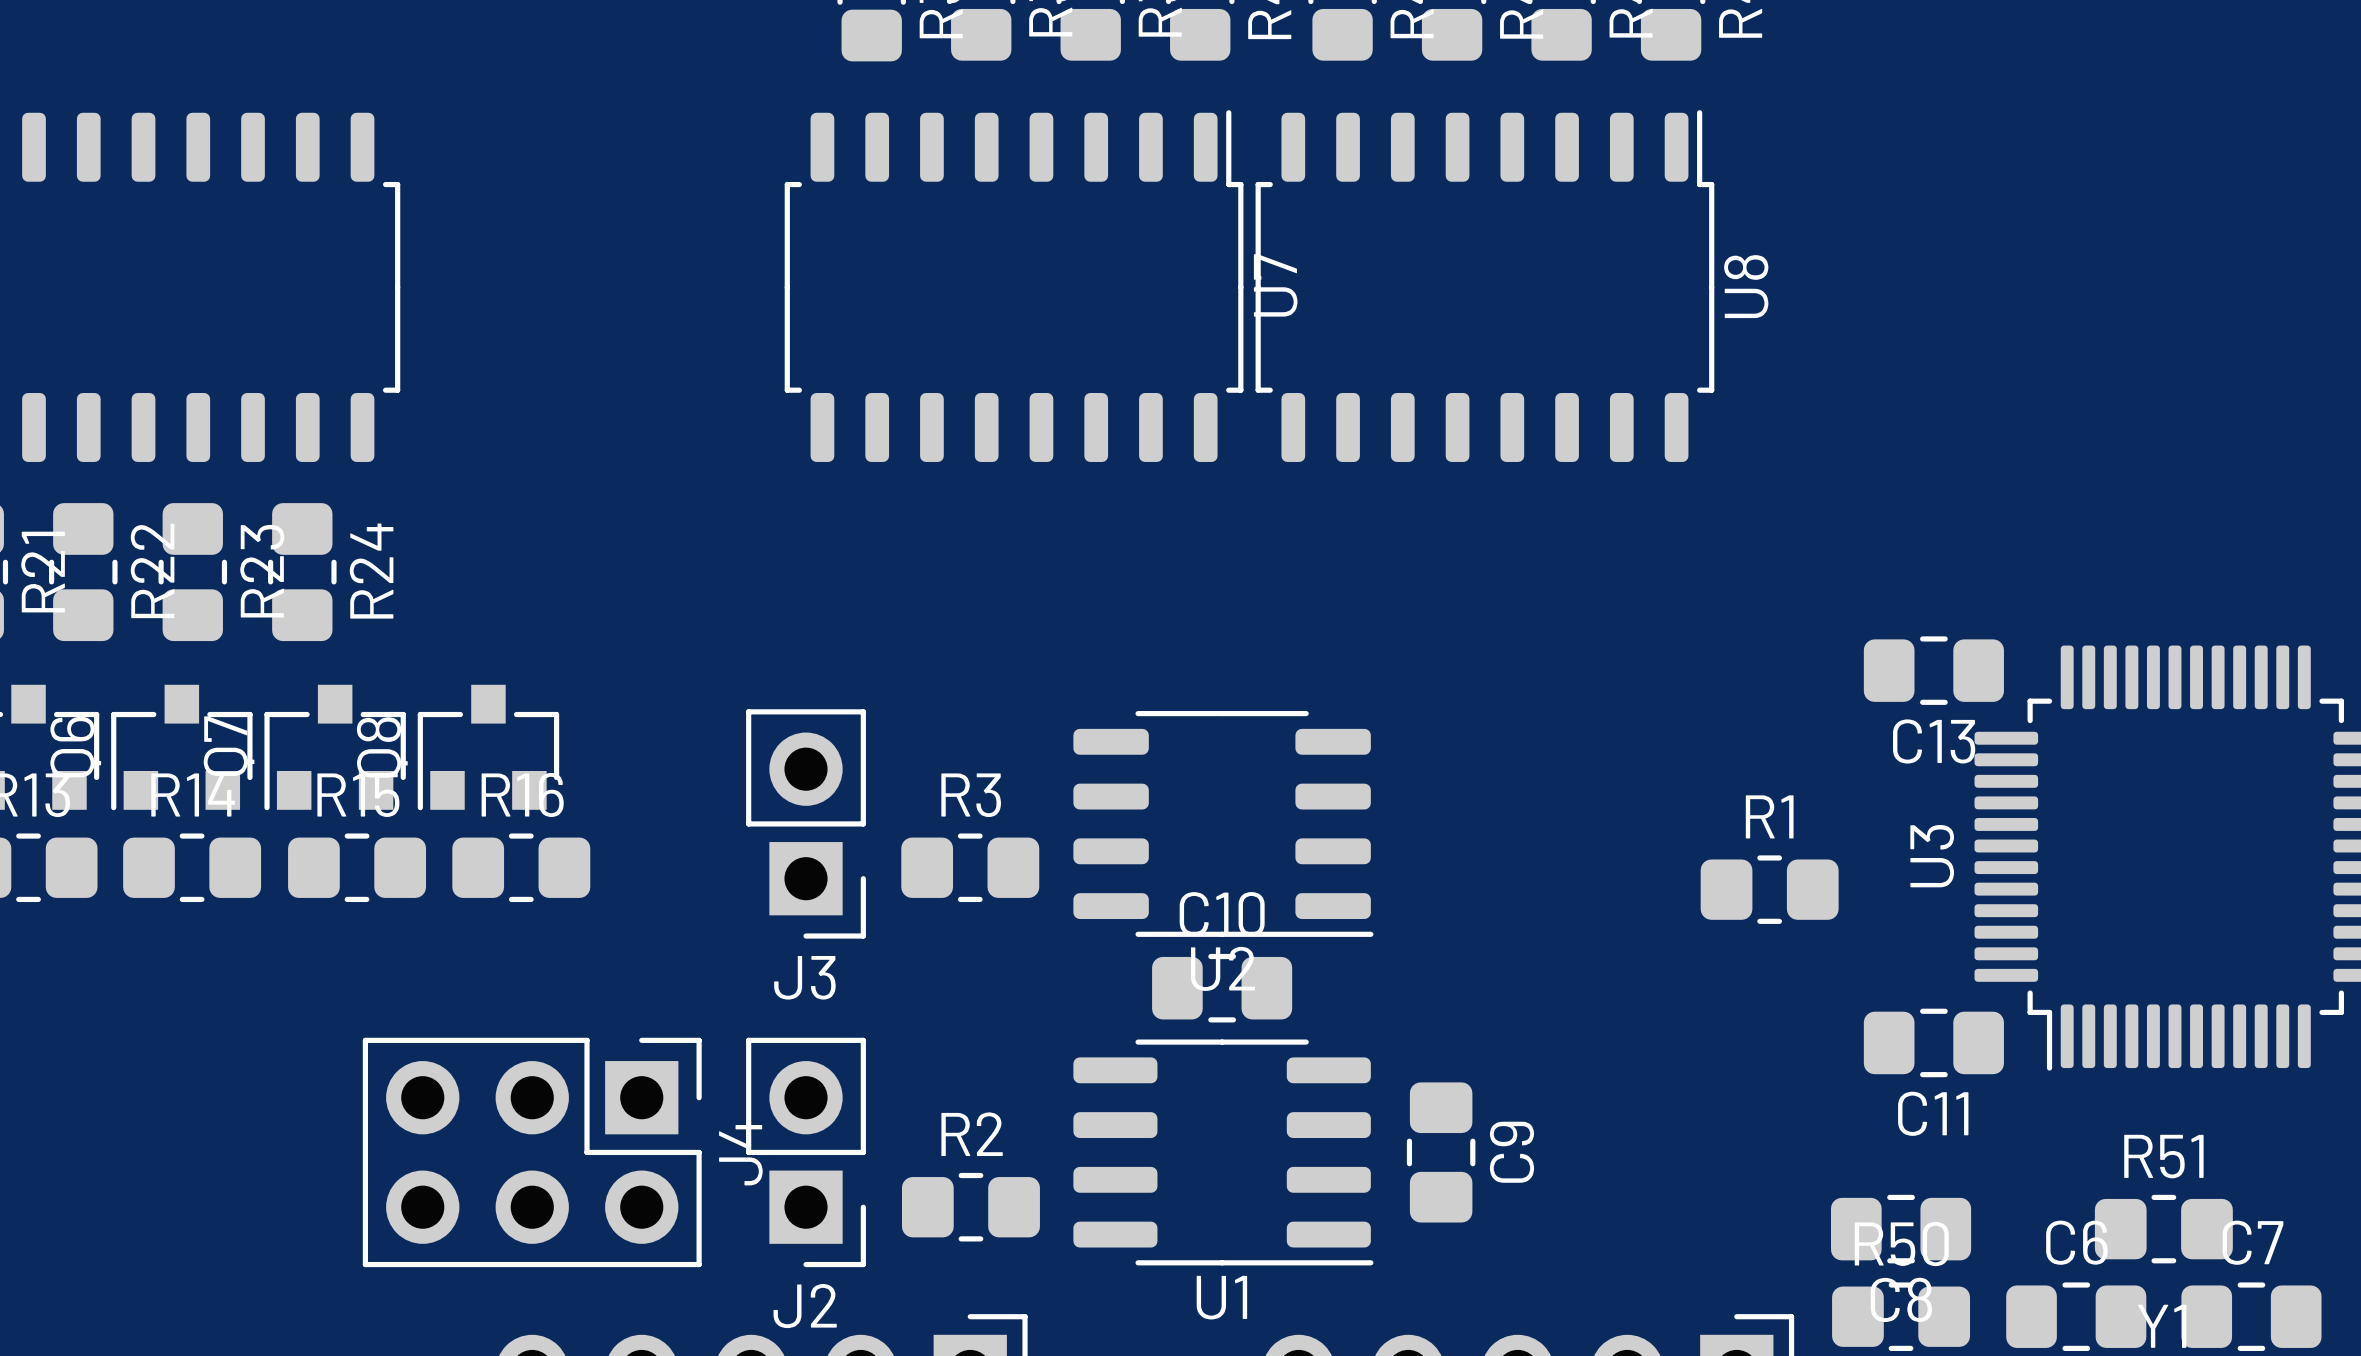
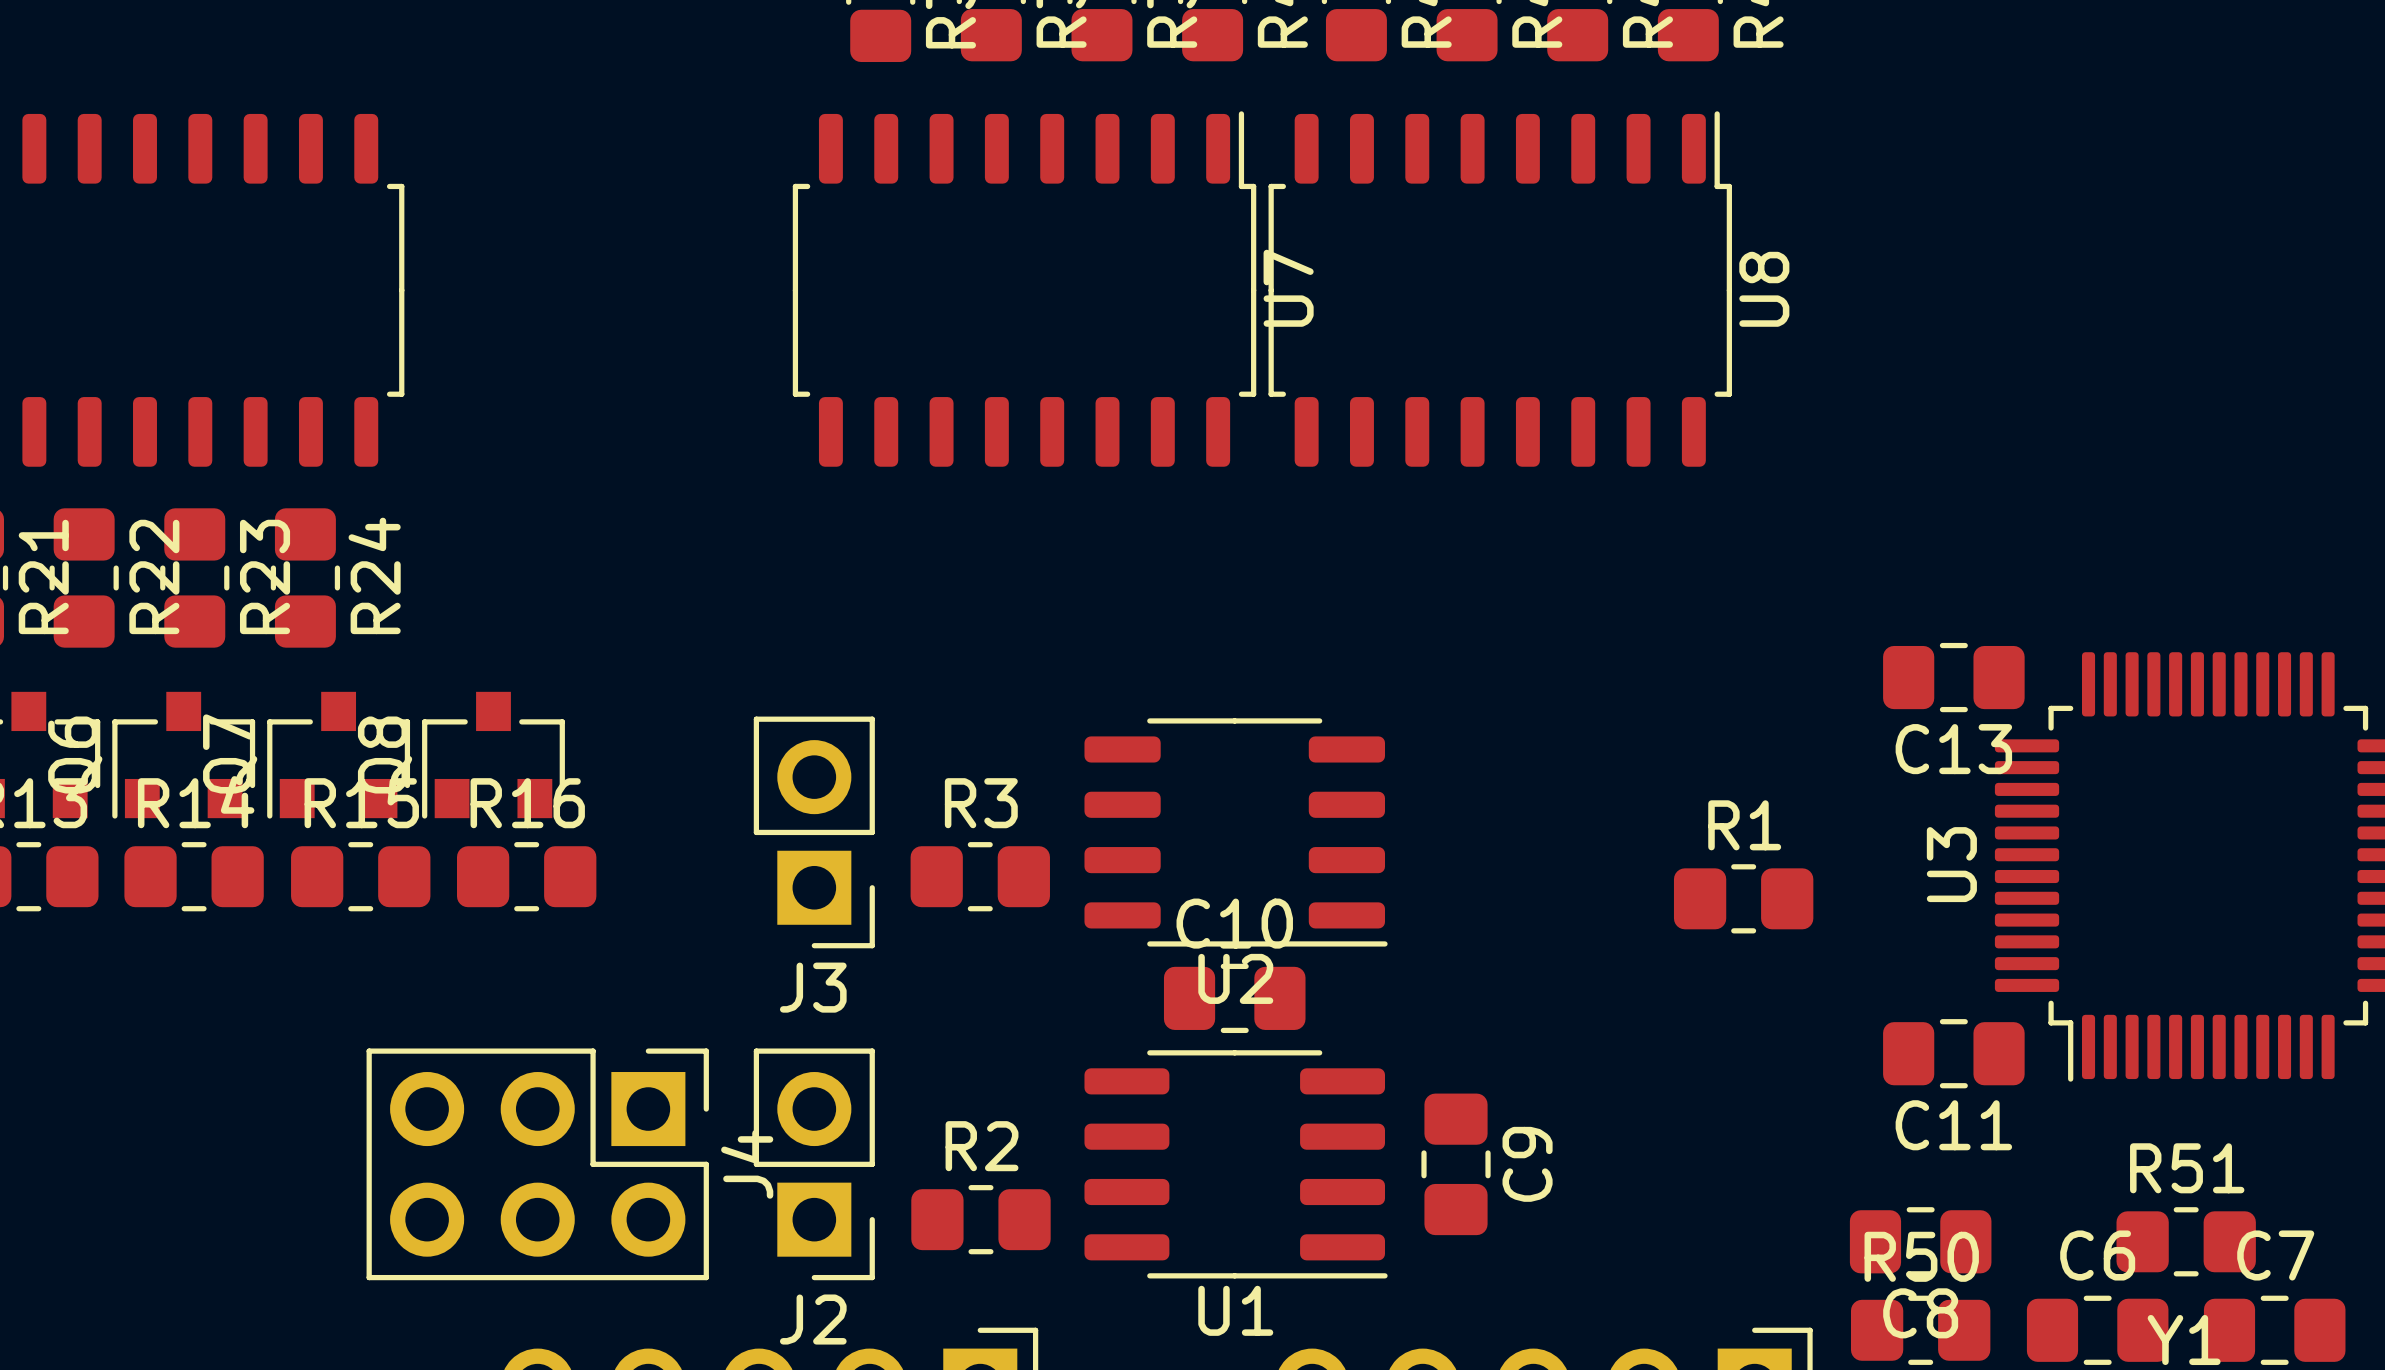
R1 position: (1769, 889) -> (1743, 898)

